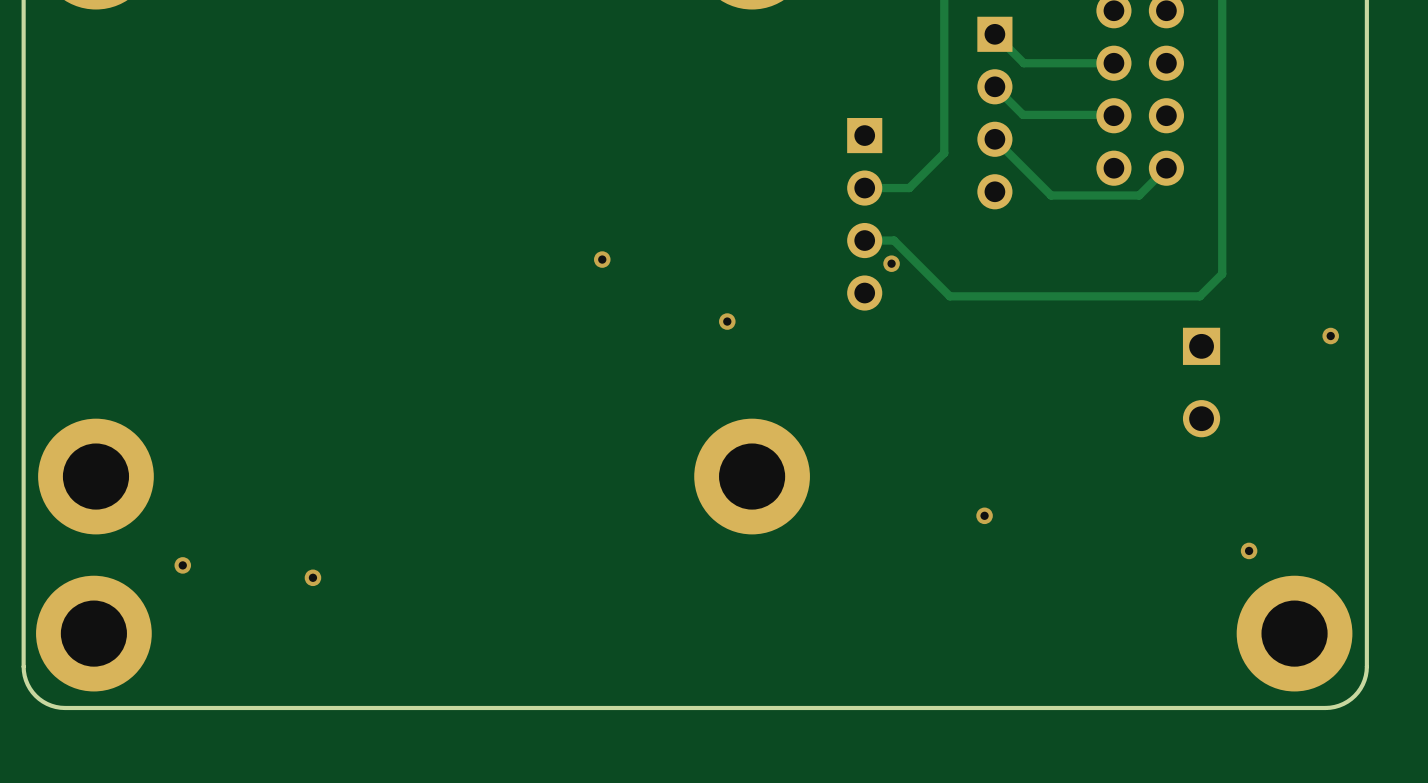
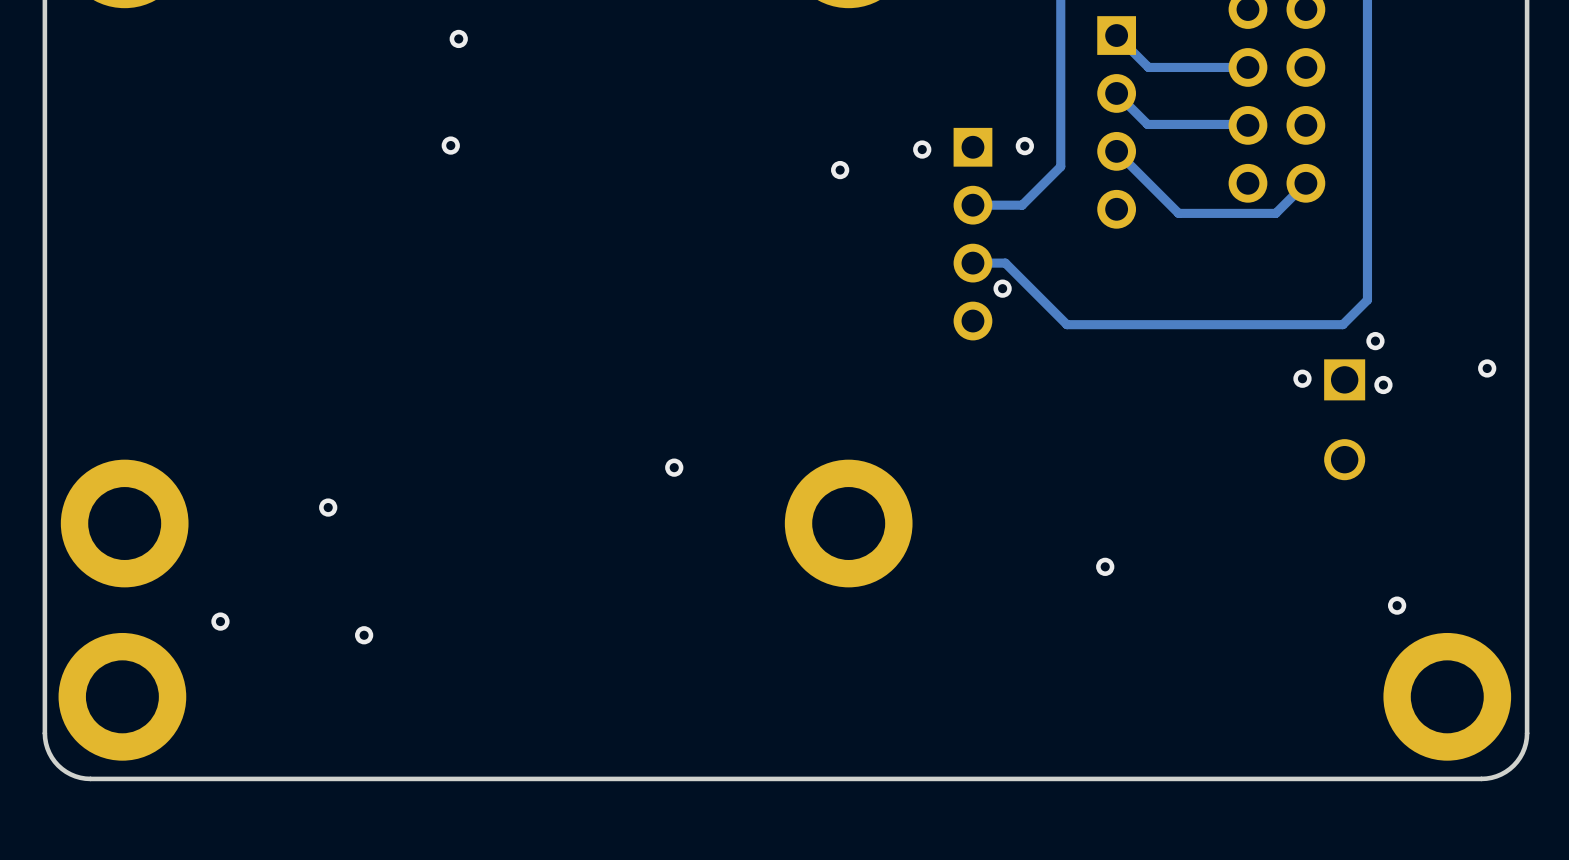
via: none -> (458, 38)
via: none -> (450, 145)
via: none -> (1024, 146)
via: none -> (922, 149)
via: none -> (840, 170)
via: (602, 259) -> none
via: none -> (1375, 341)
via: (727, 321) -> none
via: none -> (1302, 378)
via: none -> (1383, 384)
via: none -> (674, 467)
via: none -> (328, 507)

